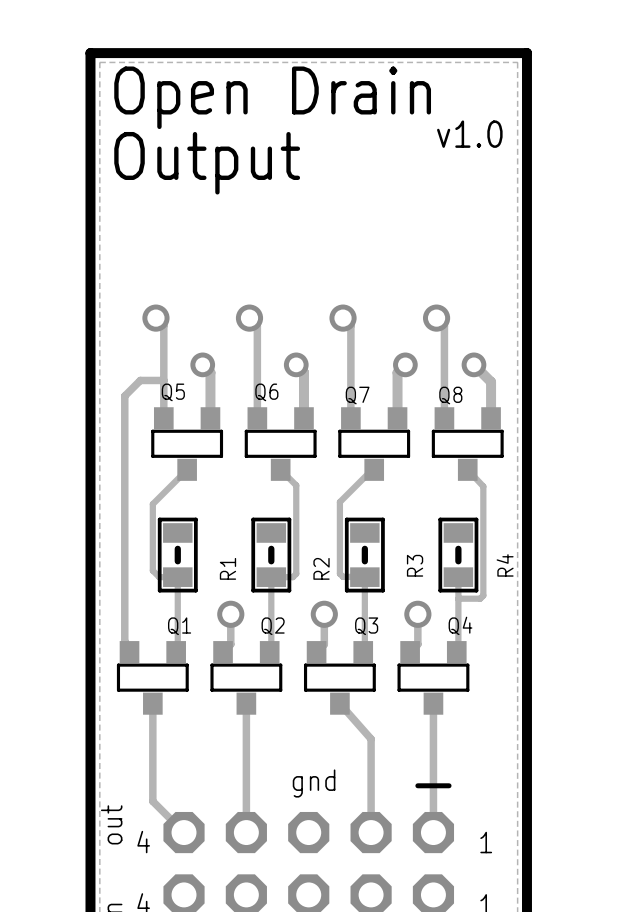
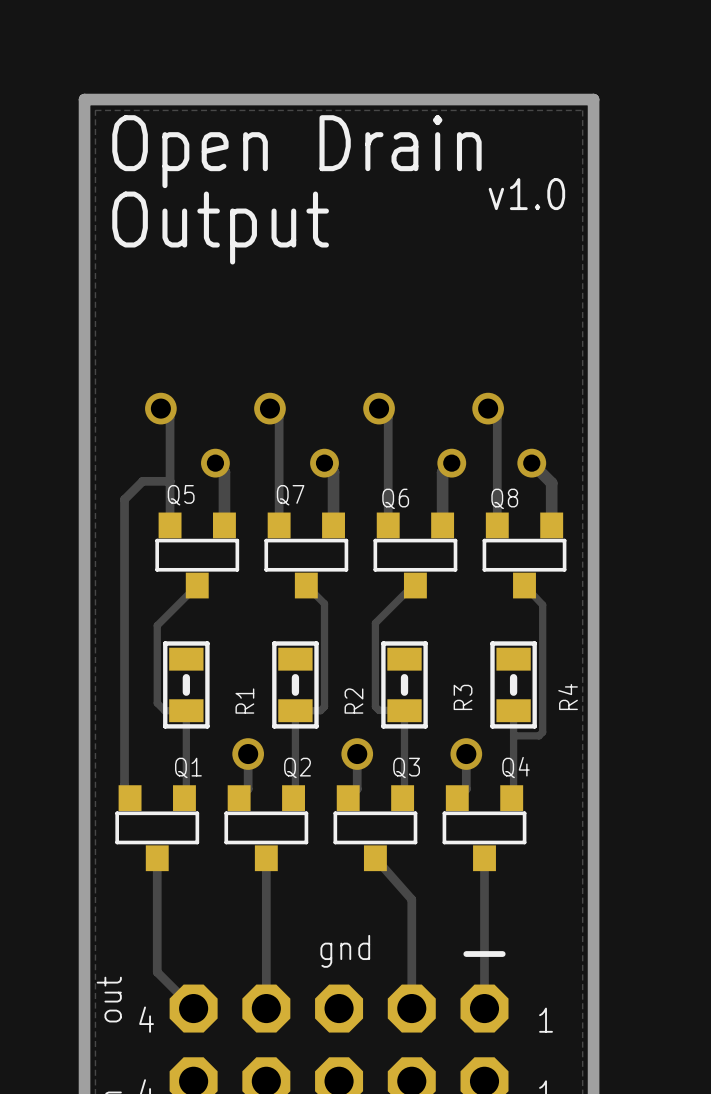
Q6 name: Q6 (266, 392) -> Q7 (290, 495)
Q7 name: Q7 (357, 395) -> Q6 (395, 498)

